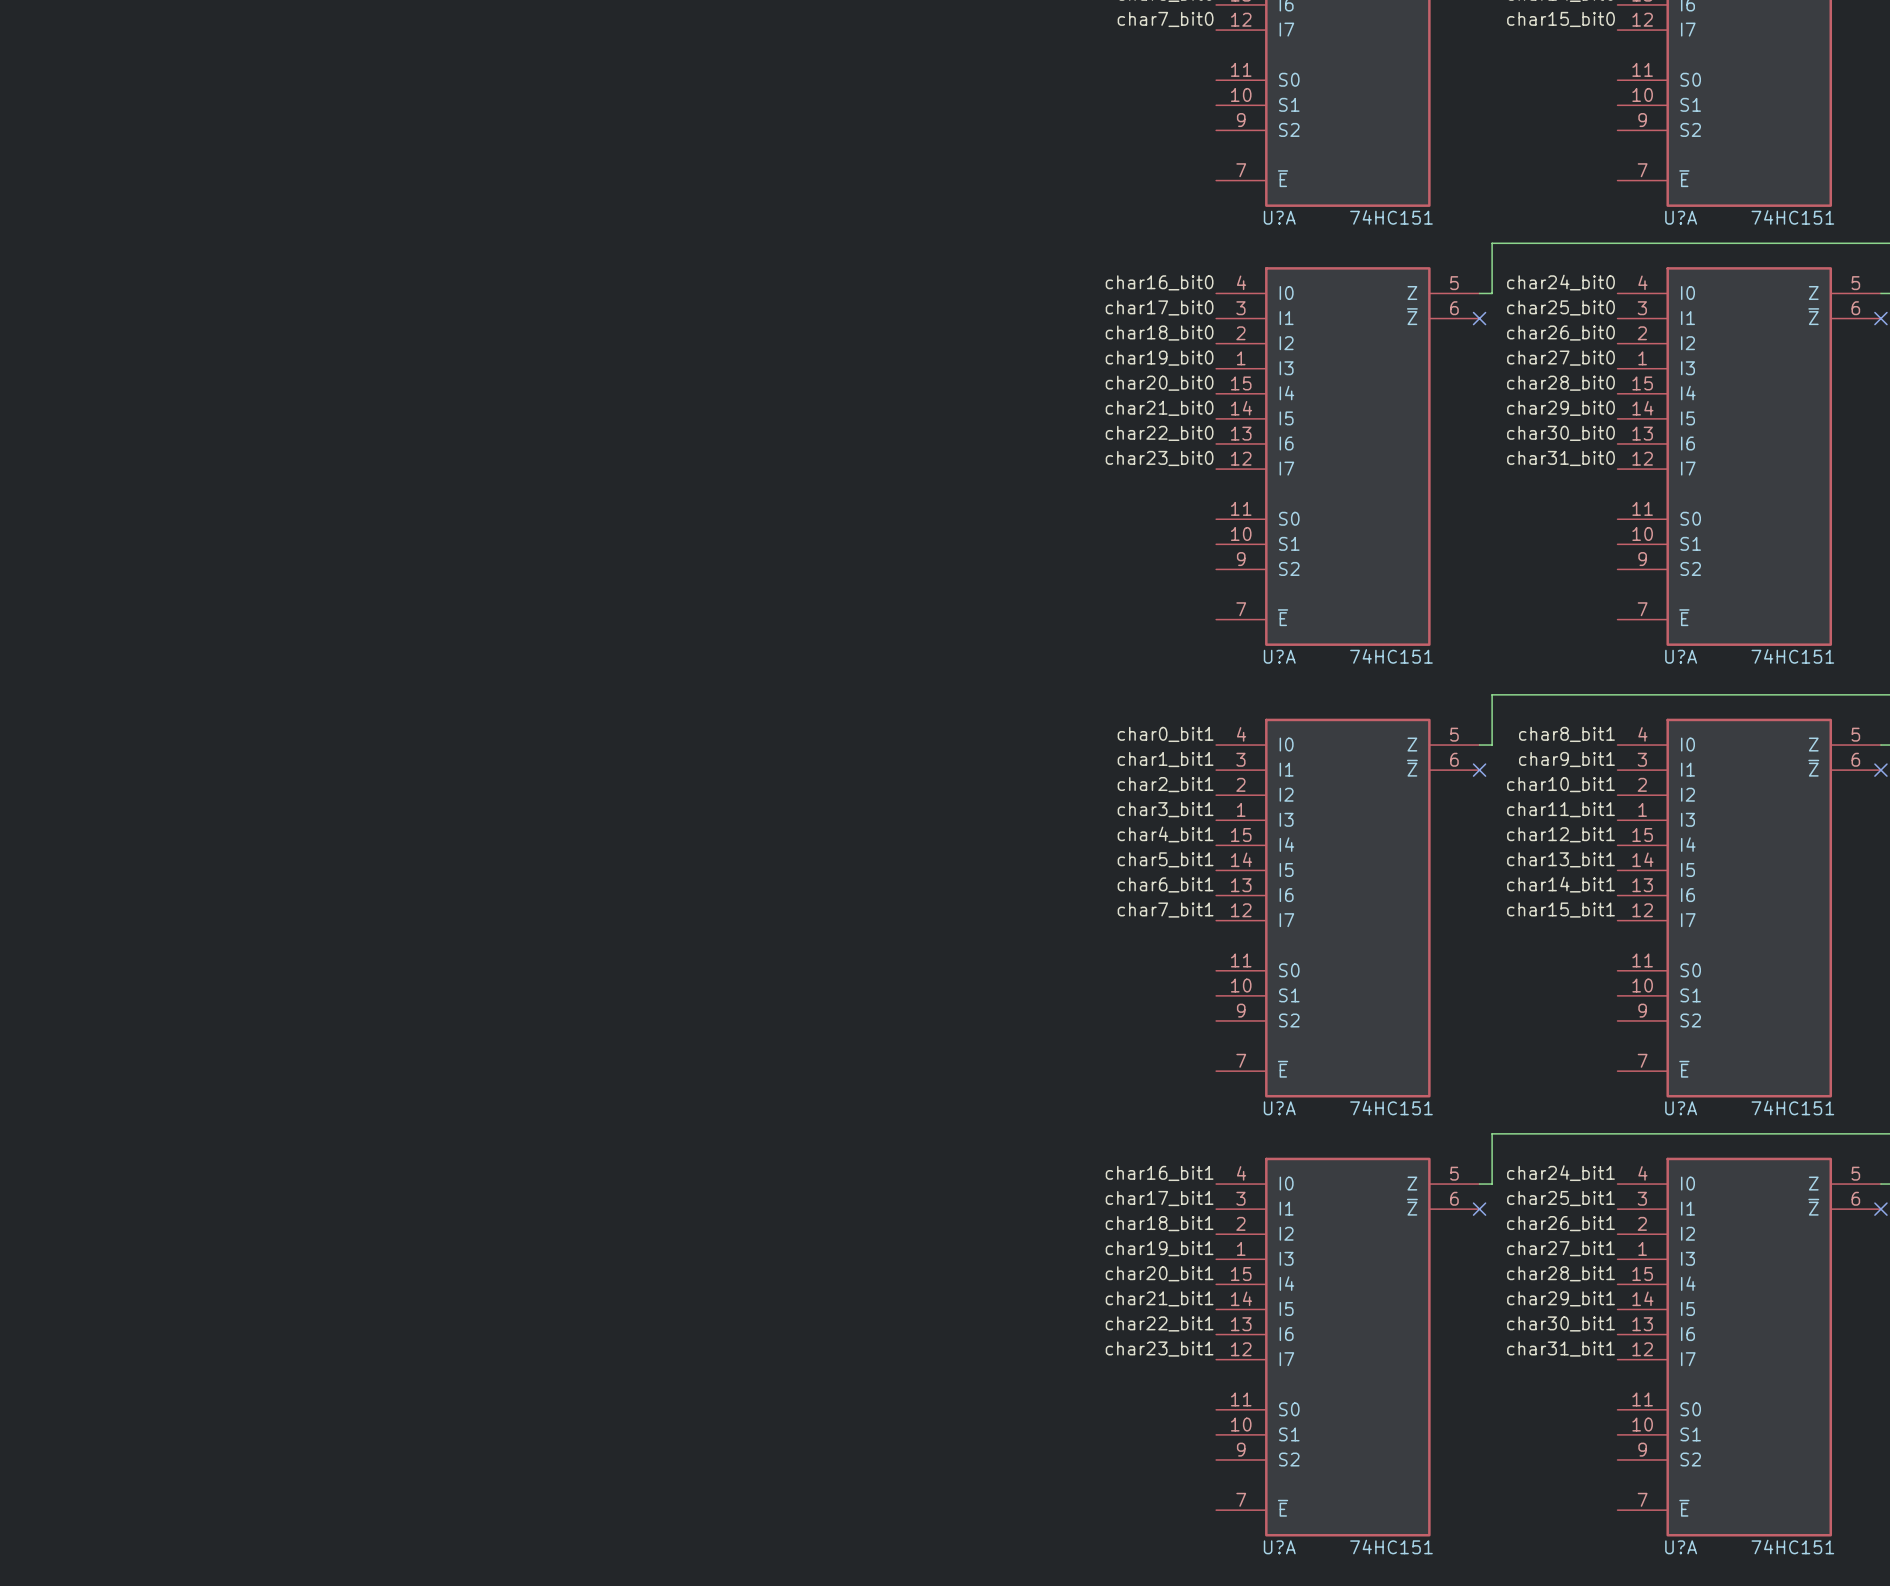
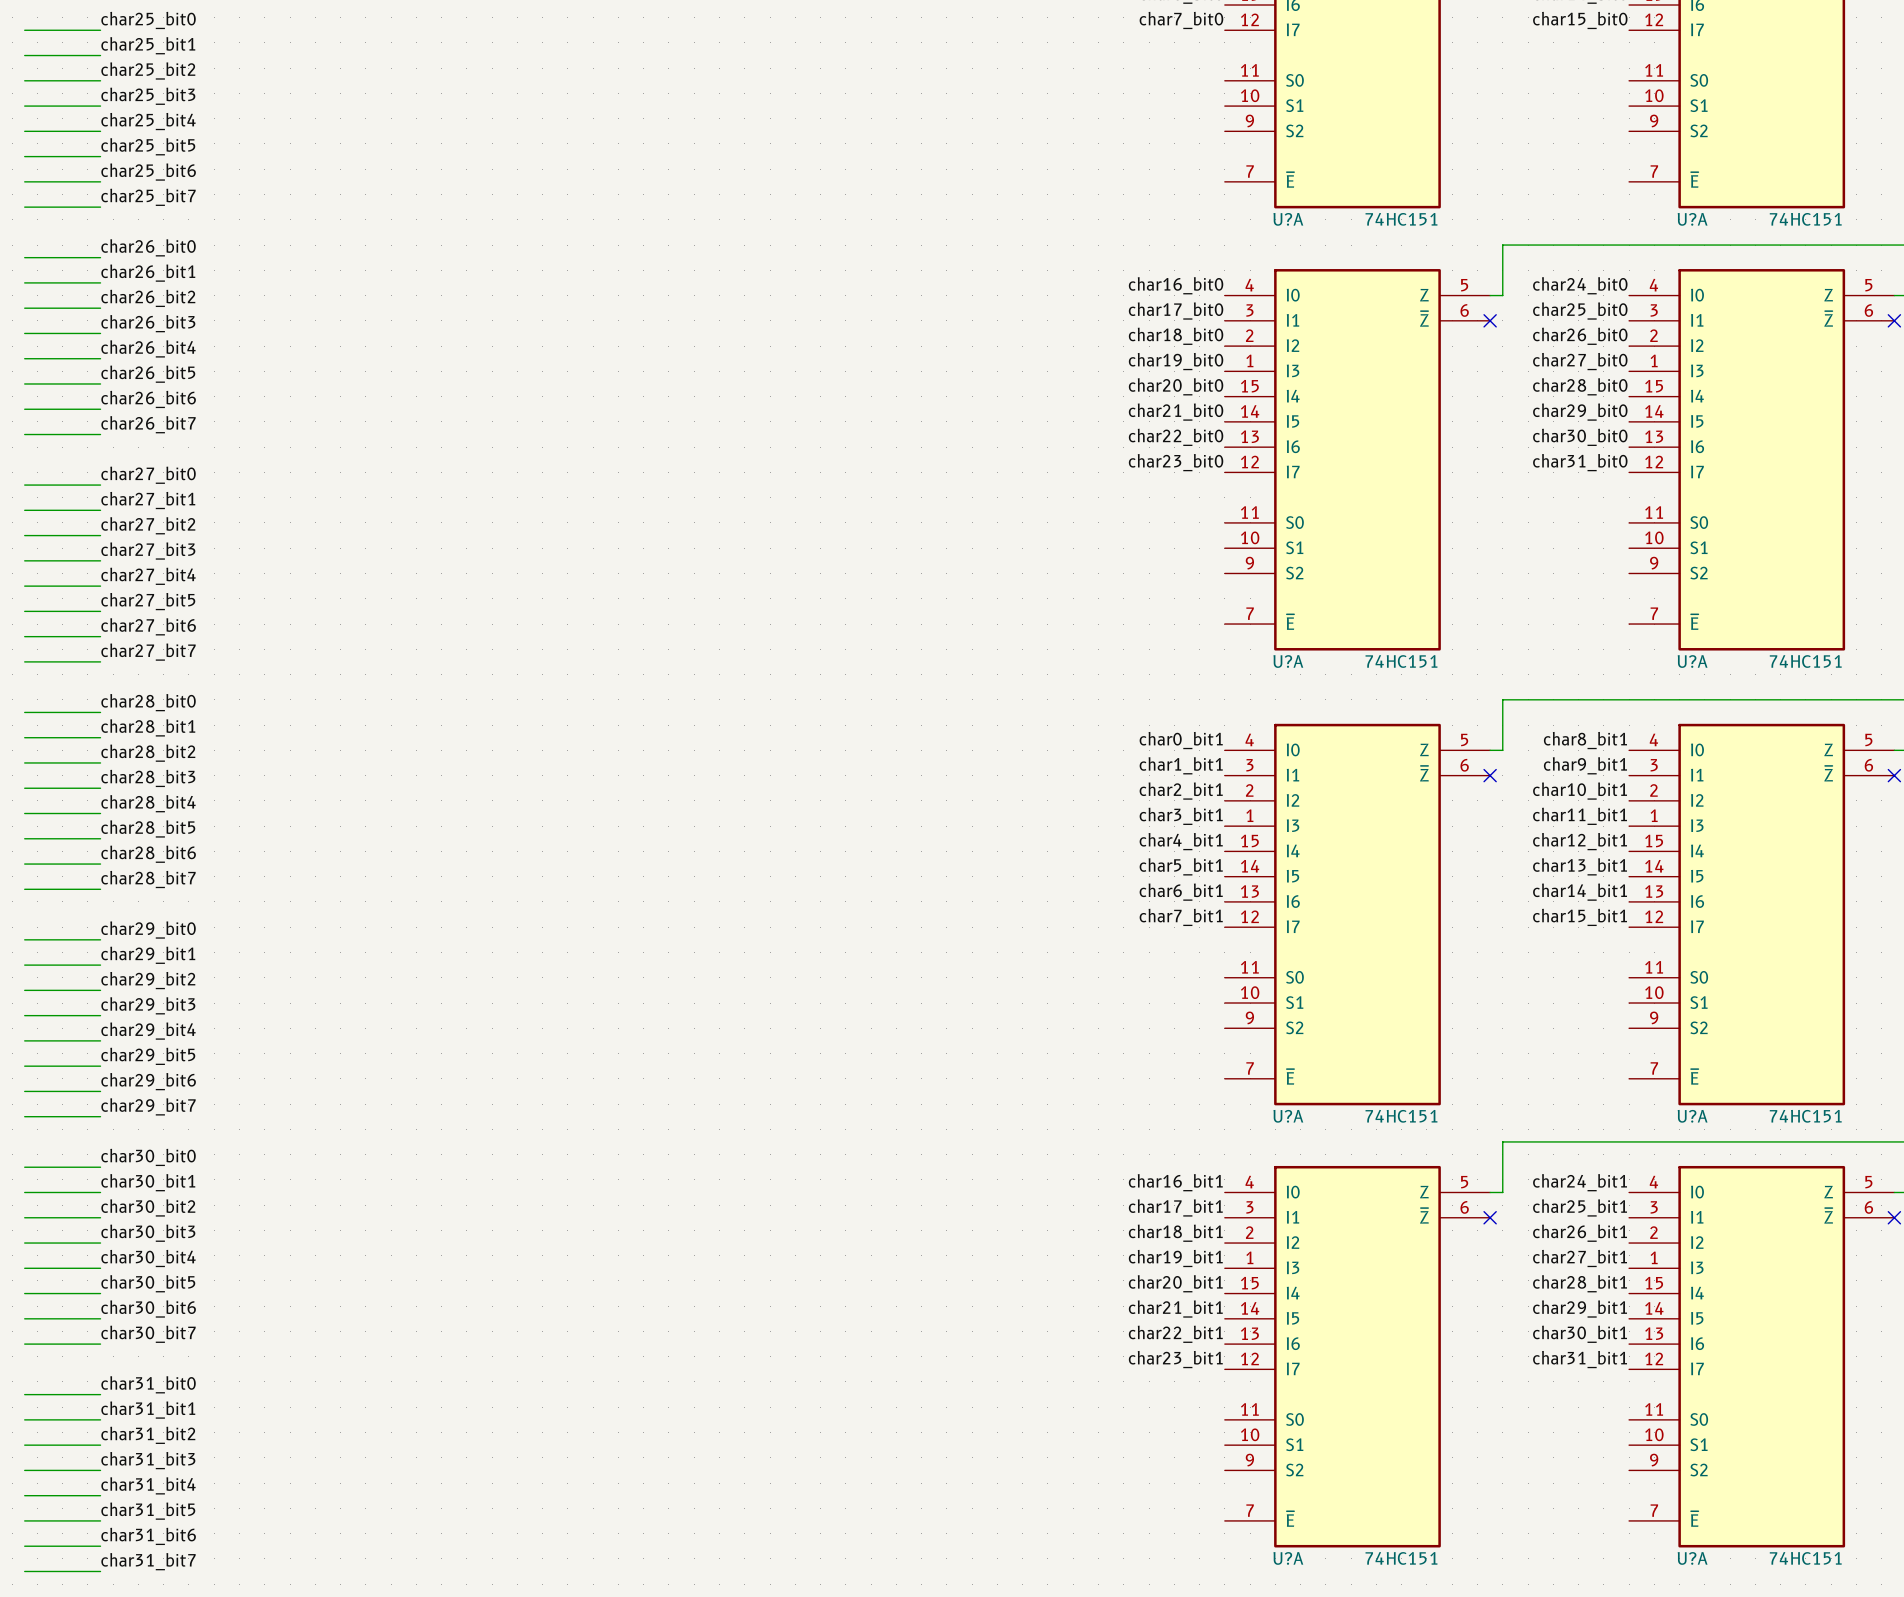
label: none -> char25_bit0 (148, 20)
wire: none -> (24, 30) (100, 30)
label: none -> char25_bit1 (148, 45)
wire: none -> (24, 55) (100, 55)
label: none -> char25_bit2 (148, 71)
wire: none -> (24, 80) (100, 80)
label: none -> char25_bit3 (148, 96)
wire: none -> (24, 106) (100, 106)
label: none -> char25_bit4 (148, 121)
wire: none -> (24, 131) (100, 131)
label: none -> char25_bit5 (148, 146)
wire: none -> (24, 156) (100, 156)
label: none -> char25_bit6 (148, 172)
wire: none -> (24, 181) (100, 181)
label: none -> char25_bit7 (148, 197)
wire: none -> (24, 207) (100, 207)
label: none -> char26_bit0 (148, 247)
wire: none -> (24, 257) (100, 257)
label: none -> char26_bit1 (148, 273)
wire: none -> (24, 282) (100, 282)
label: none -> char26_bit2 (148, 298)
wire: none -> (24, 308) (100, 308)
label: none -> char26_bit3 (148, 323)
wire: none -> (24, 333) (100, 333)
label: none -> char26_bit4 (148, 348)
wire: none -> (24, 358) (100, 358)
label: none -> char26_bit5 (148, 374)
wire: none -> (24, 383) (100, 383)
label: none -> char26_bit6 (148, 399)
wire: none -> (24, 409) (100, 409)
label: none -> char26_bit7 (148, 424)
wire: none -> (24, 434) (100, 434)
label: none -> char27_bit0 (148, 475)
wire: none -> (24, 485) (100, 485)
label: none -> char27_bit1 (148, 500)
wire: none -> (24, 510) (100, 510)
label: none -> char27_bit2 (148, 525)
wire: none -> (24, 535) (100, 535)
label: none -> char27_bit3 (148, 551)
wire: none -> (24, 560) (100, 560)
label: none -> char27_bit4 (148, 576)
wire: none -> (24, 586) (100, 586)
label: none -> char27_bit5 (148, 601)
wire: none -> (24, 611) (100, 611)
label: none -> char27_bit6 (148, 626)
wire: none -> (24, 636) (100, 636)
label: none -> char27_bit7 (148, 652)
wire: none -> (24, 661) (100, 661)
label: none -> char28_bit0 (148, 702)
wire: none -> (24, 712) (100, 712)
label: none -> char28_bit1 (148, 727)
wire: none -> (24, 737) (100, 737)
label: none -> char28_bit2 (148, 753)
wire: none -> (24, 762) (100, 762)
label: none -> char28_bit3 (148, 778)
wire: none -> (24, 788) (100, 788)
label: none -> char28_bit4 (148, 803)
wire: none -> (24, 813) (100, 813)
label: none -> char28_bit5 (148, 828)
wire: none -> (24, 838) (100, 838)
label: none -> char28_bit6 (148, 854)
wire: none -> (24, 864) (100, 864)
label: none -> char28_bit7 (148, 879)
wire: none -> (24, 889) (100, 889)
label: none -> char29_bit0 (148, 930)
wire: none -> (24, 939) (100, 939)
label: none -> char29_bit1 (148, 955)
wire: none -> (24, 965) (100, 965)
label: none -> char29_bit2 (148, 980)
wire: none -> (24, 990) (100, 990)
label: none -> char29_bit3 (148, 1005)
wire: none -> (24, 1015) (100, 1015)
label: none -> char29_bit4 (148, 1031)
wire: none -> (24, 1040) (100, 1040)
label: none -> char29_bit5 (148, 1056)
wire: none -> (24, 1066) (100, 1066)
label: none -> char29_bit6 (148, 1081)
wire: none -> (24, 1091) (100, 1091)
label: none -> char29_bit7 (148, 1106)
wire: none -> (24, 1116) (100, 1116)
label: none -> char30_bit0 (148, 1157)
wire: none -> (24, 1167) (100, 1167)
label: none -> char30_bit1 (148, 1182)
wire: none -> (24, 1192) (100, 1192)
label: none -> char30_bit2 (148, 1207)
wire: none -> (24, 1217) (100, 1217)
label: none -> char30_bit3 (148, 1233)
wire: none -> (24, 1243) (100, 1243)
label: none -> char30_bit4 (148, 1258)
wire: none -> (24, 1268) (100, 1268)
label: none -> char30_bit5 (148, 1283)
wire: none -> (24, 1293) (100, 1293)
label: none -> char30_bit6 (148, 1309)
wire: none -> (24, 1318) (100, 1318)
label: none -> char30_bit7 (148, 1334)
wire: none -> (24, 1344) (100, 1344)
label: none -> char31_bit0 (148, 1384)
wire: none -> (24, 1394) (100, 1394)
label: none -> char31_bit1 (148, 1410)
wire: none -> (24, 1419) (100, 1419)
label: none -> char31_bit2 (148, 1435)
wire: none -> (24, 1445) (100, 1445)
label: none -> char31_bit3 (148, 1460)
wire: none -> (24, 1470) (100, 1470)
label: none -> char31_bit4 (148, 1485)
wire: none -> (24, 1495) (100, 1495)
label: none -> char31_bit5 (148, 1511)
wire: none -> (24, 1520) (100, 1520)
label: none -> char31_bit6 (148, 1536)
wire: none -> (24, 1546) (100, 1546)
label: none -> char31_bit7 (148, 1561)
wire: none -> (24, 1571) (100, 1571)

